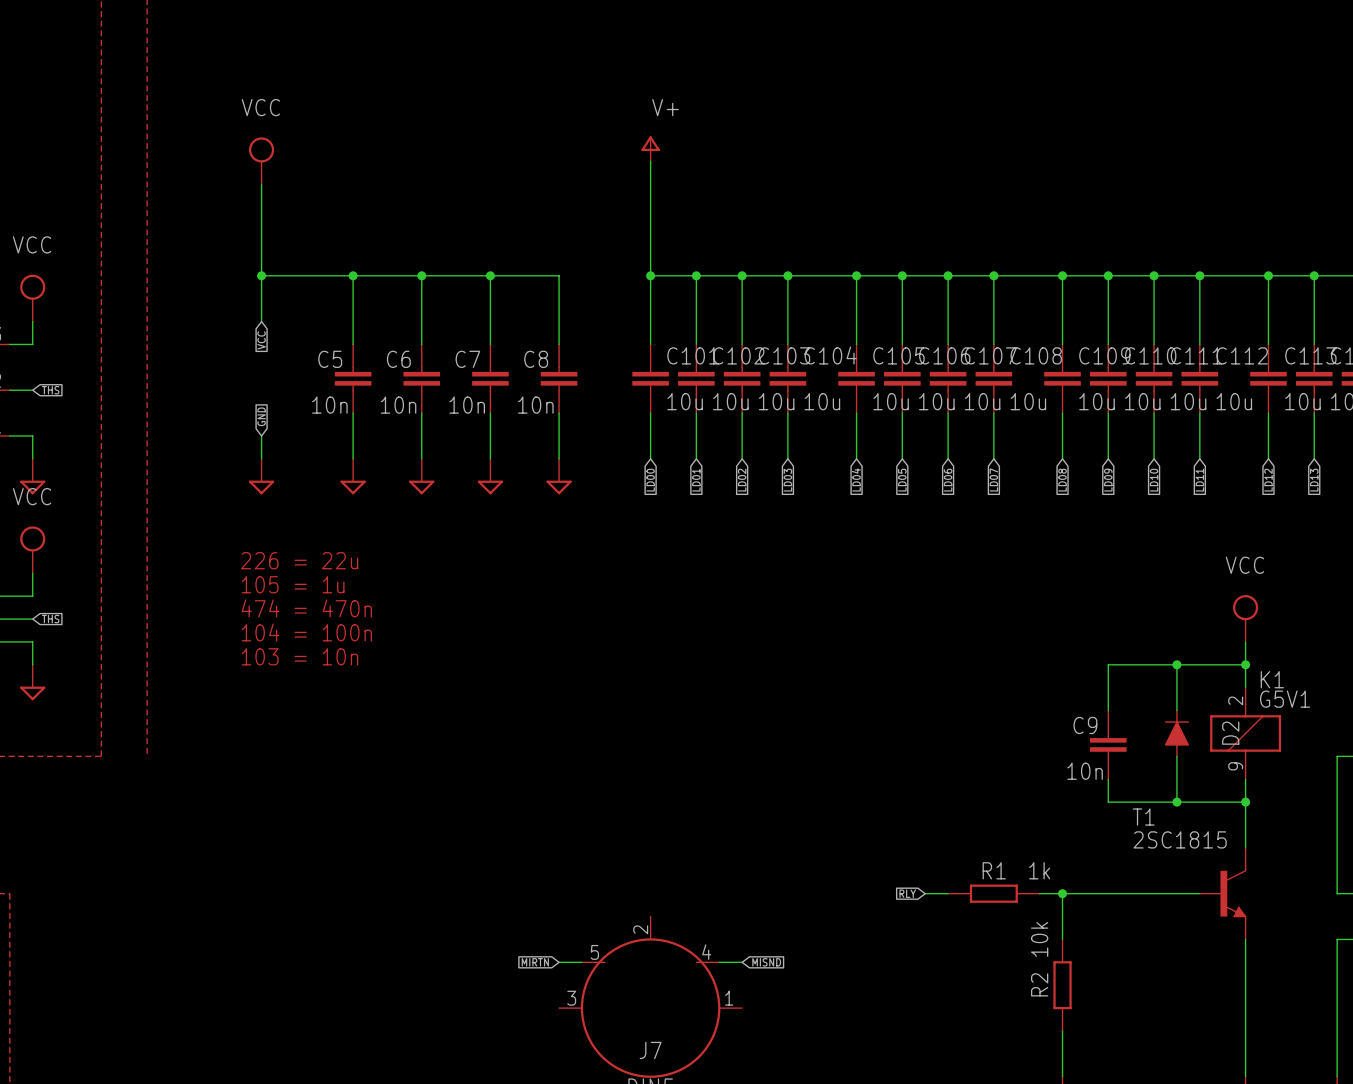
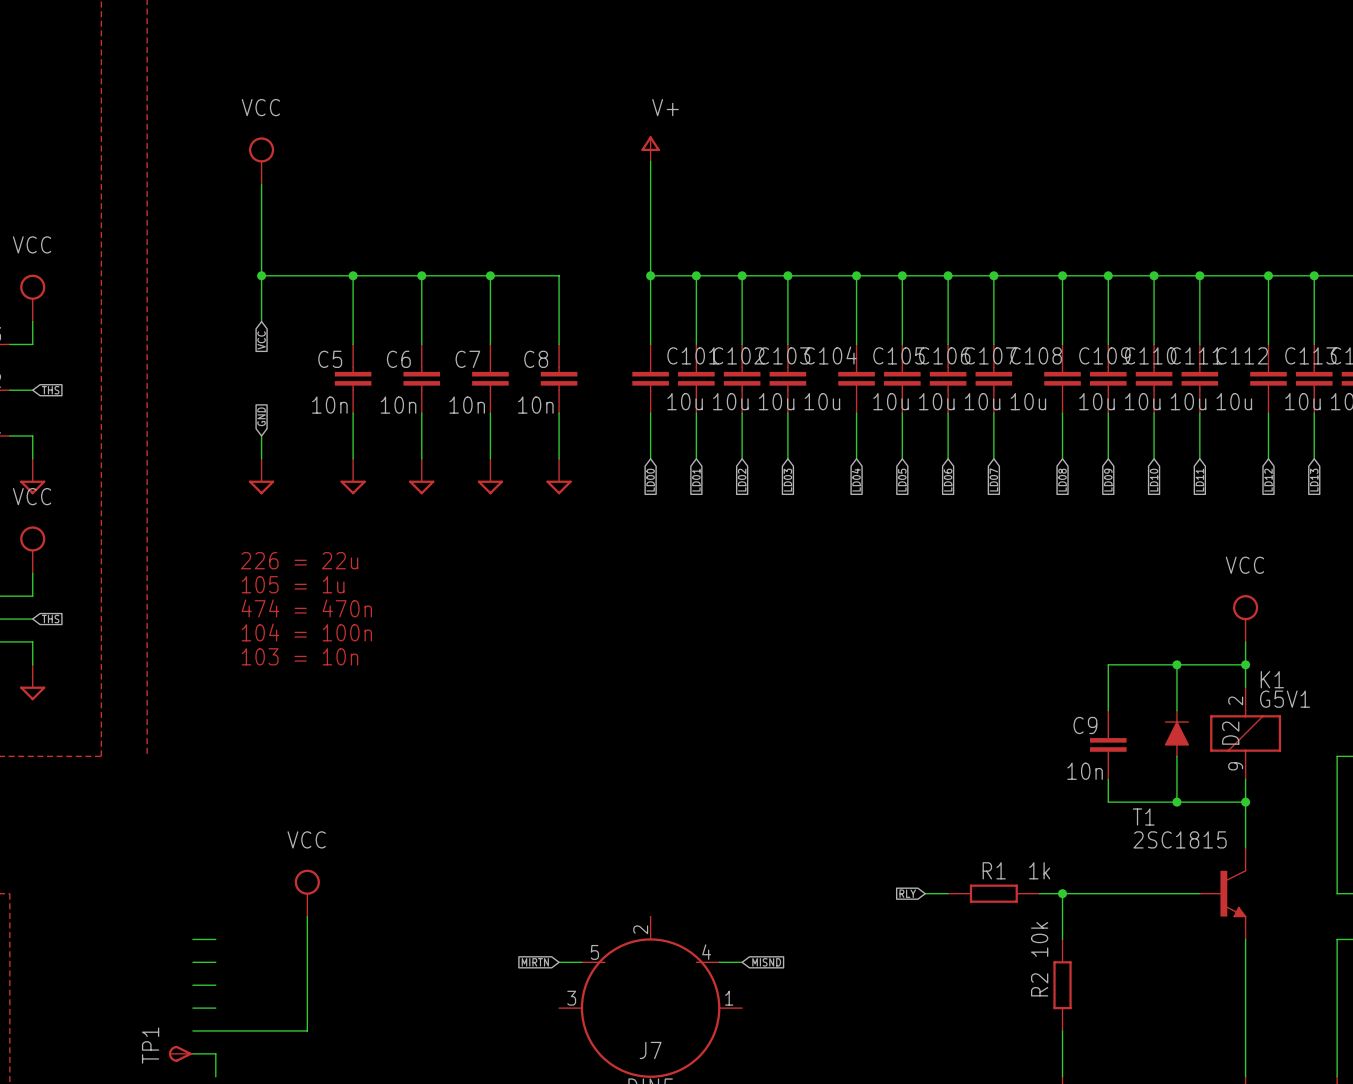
power symbol: none -> VCC (307, 893)
wire: none -> (307, 916) (307, 1030) (192, 1030)
wire: none -> (192, 939) (215, 939)
wire: none -> (192, 962) (215, 962)
wire: none -> (192, 985) (215, 985)
wire: none -> (192, 1008) (215, 1008)
TP1: none -> (180, 1053)
wire: none -> (192, 1053) (215, 1053) (215, 1076)

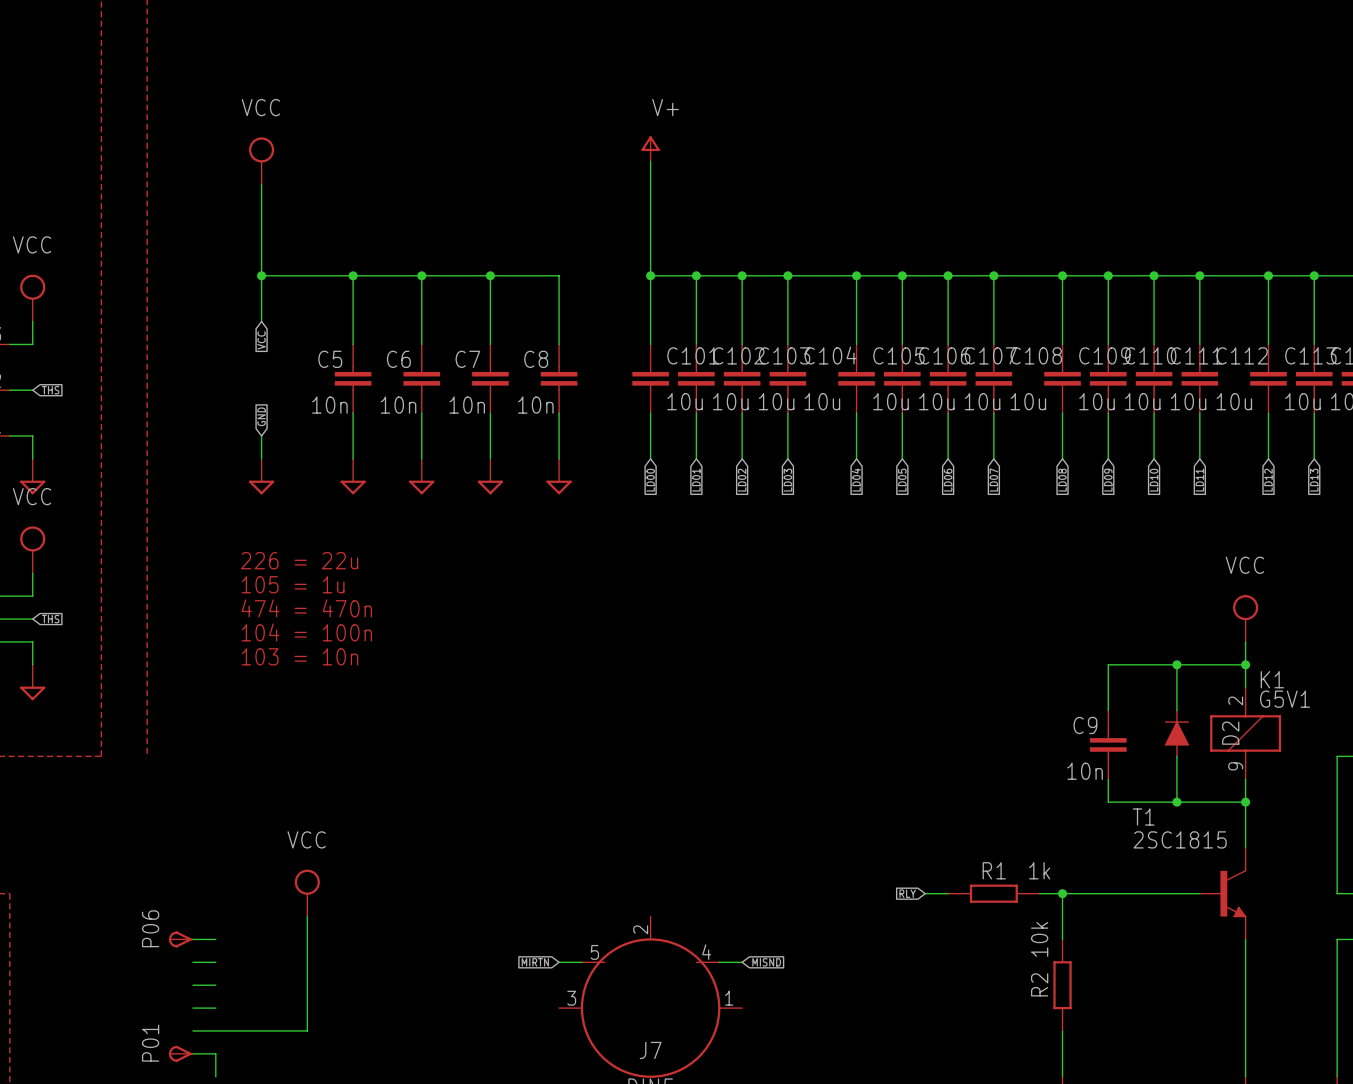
P06: none -> (180, 939)
TP1 name: TP1 (150, 1045) -> P01 (150, 1043)

